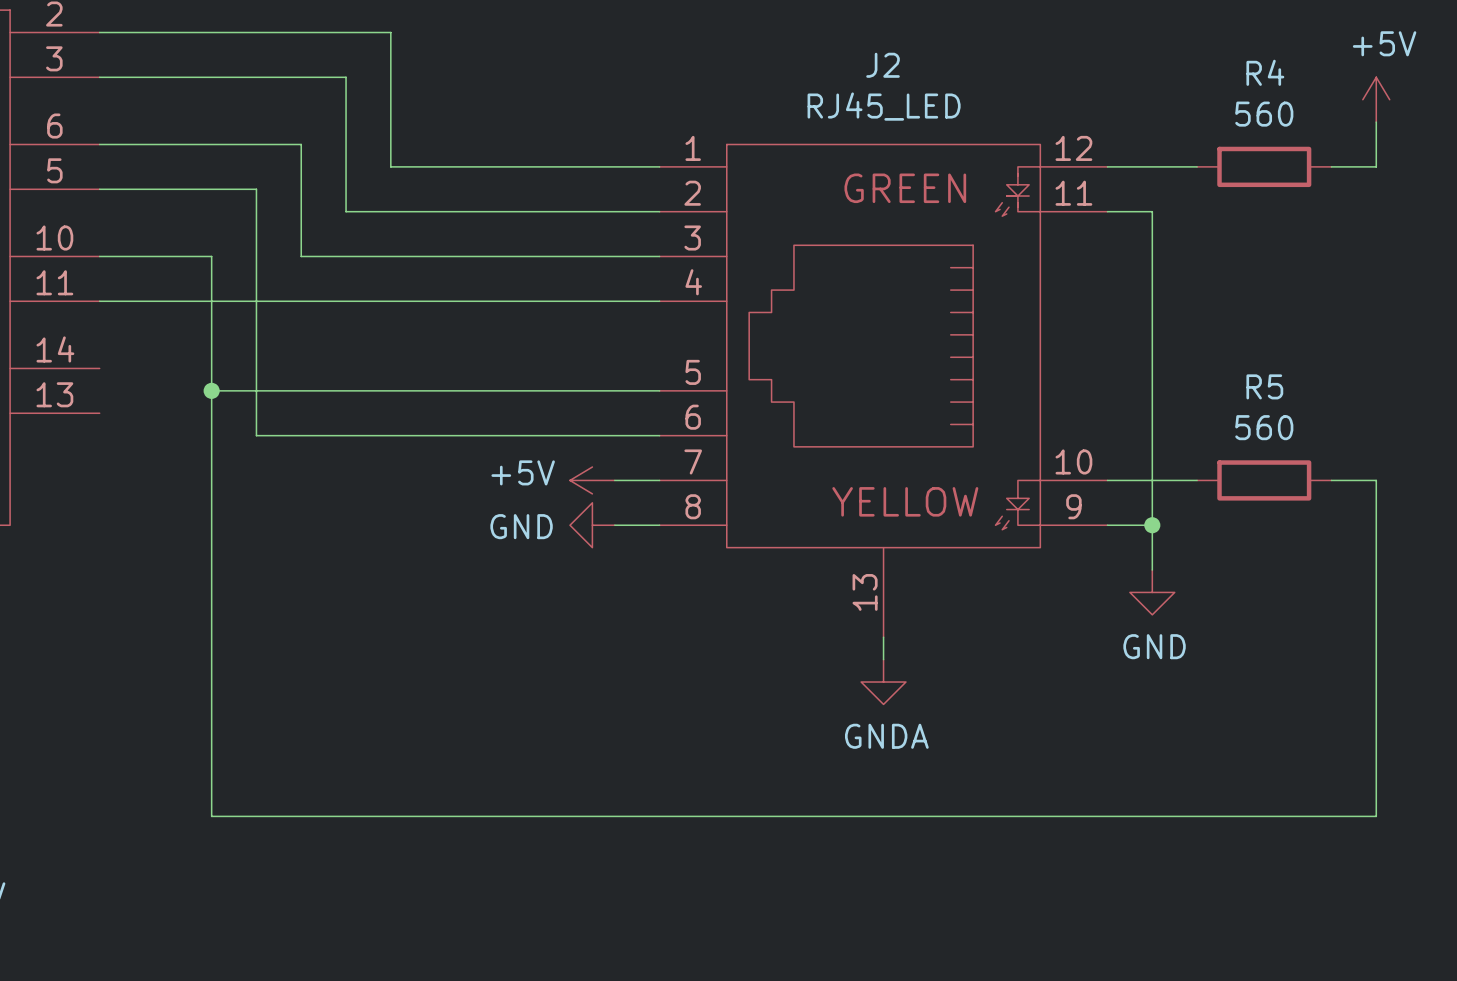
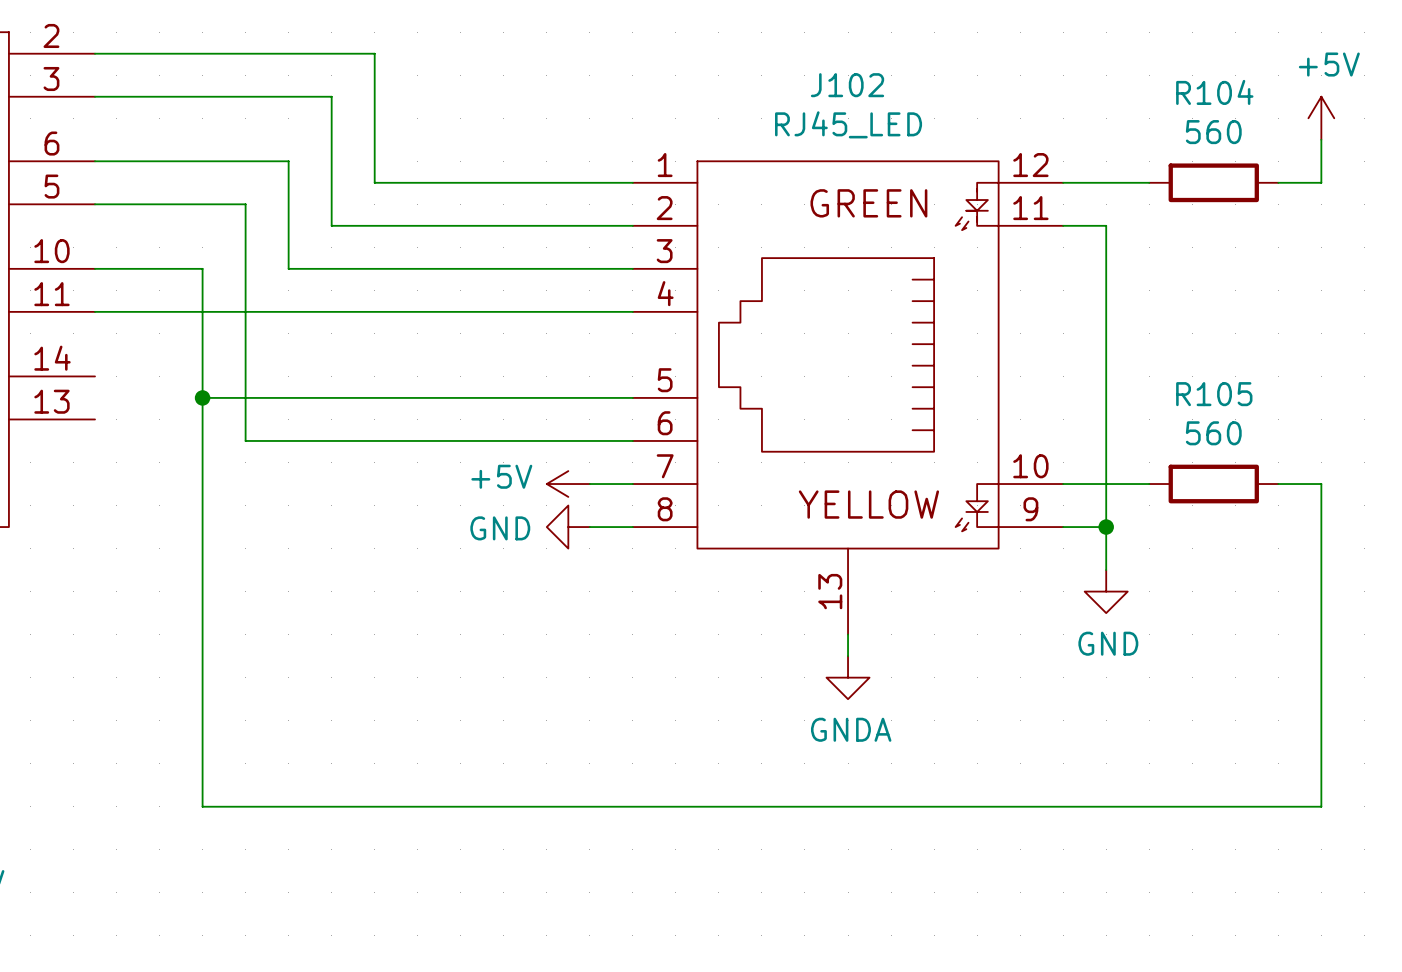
J2 name: J2 (883, 65) -> J102 (847, 85)
R4 name: R4 (1265, 72) -> R104 (1214, 92)
R5 name: R5 (1264, 386) -> R105 (1214, 394)

